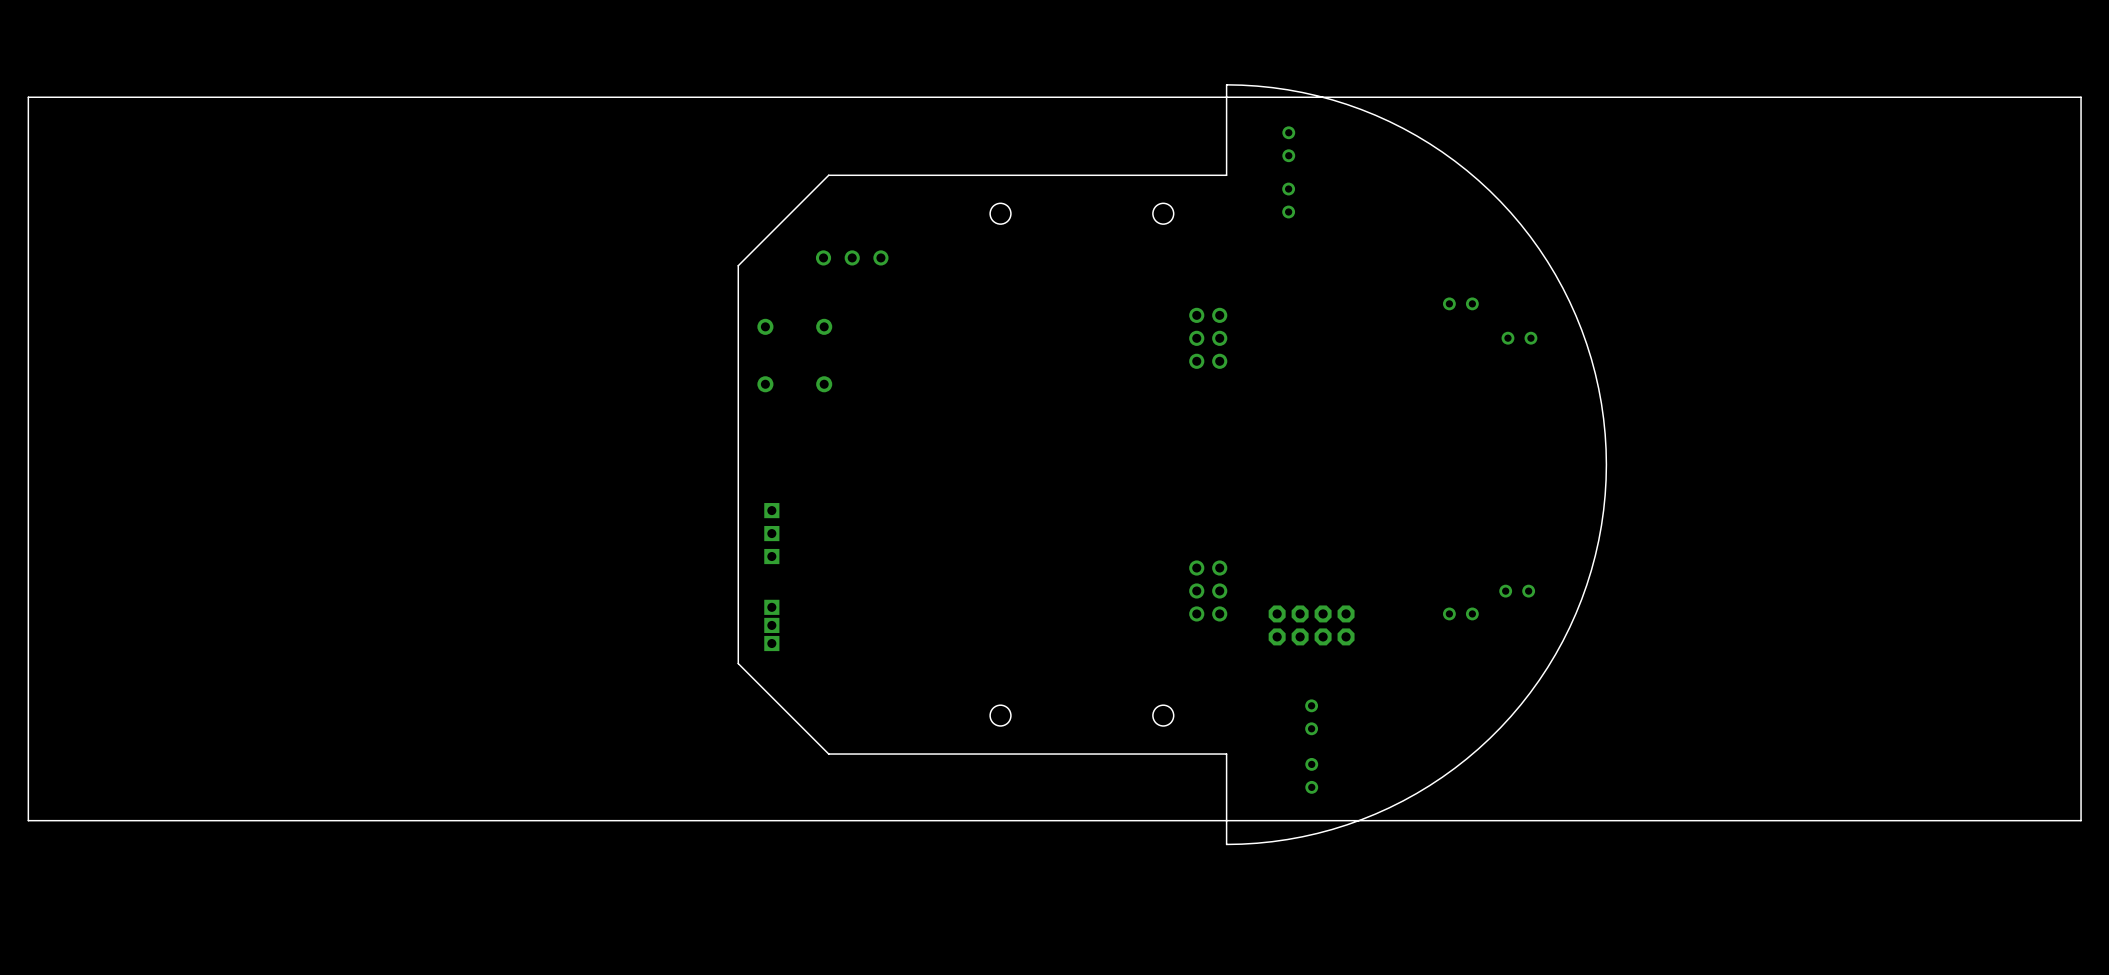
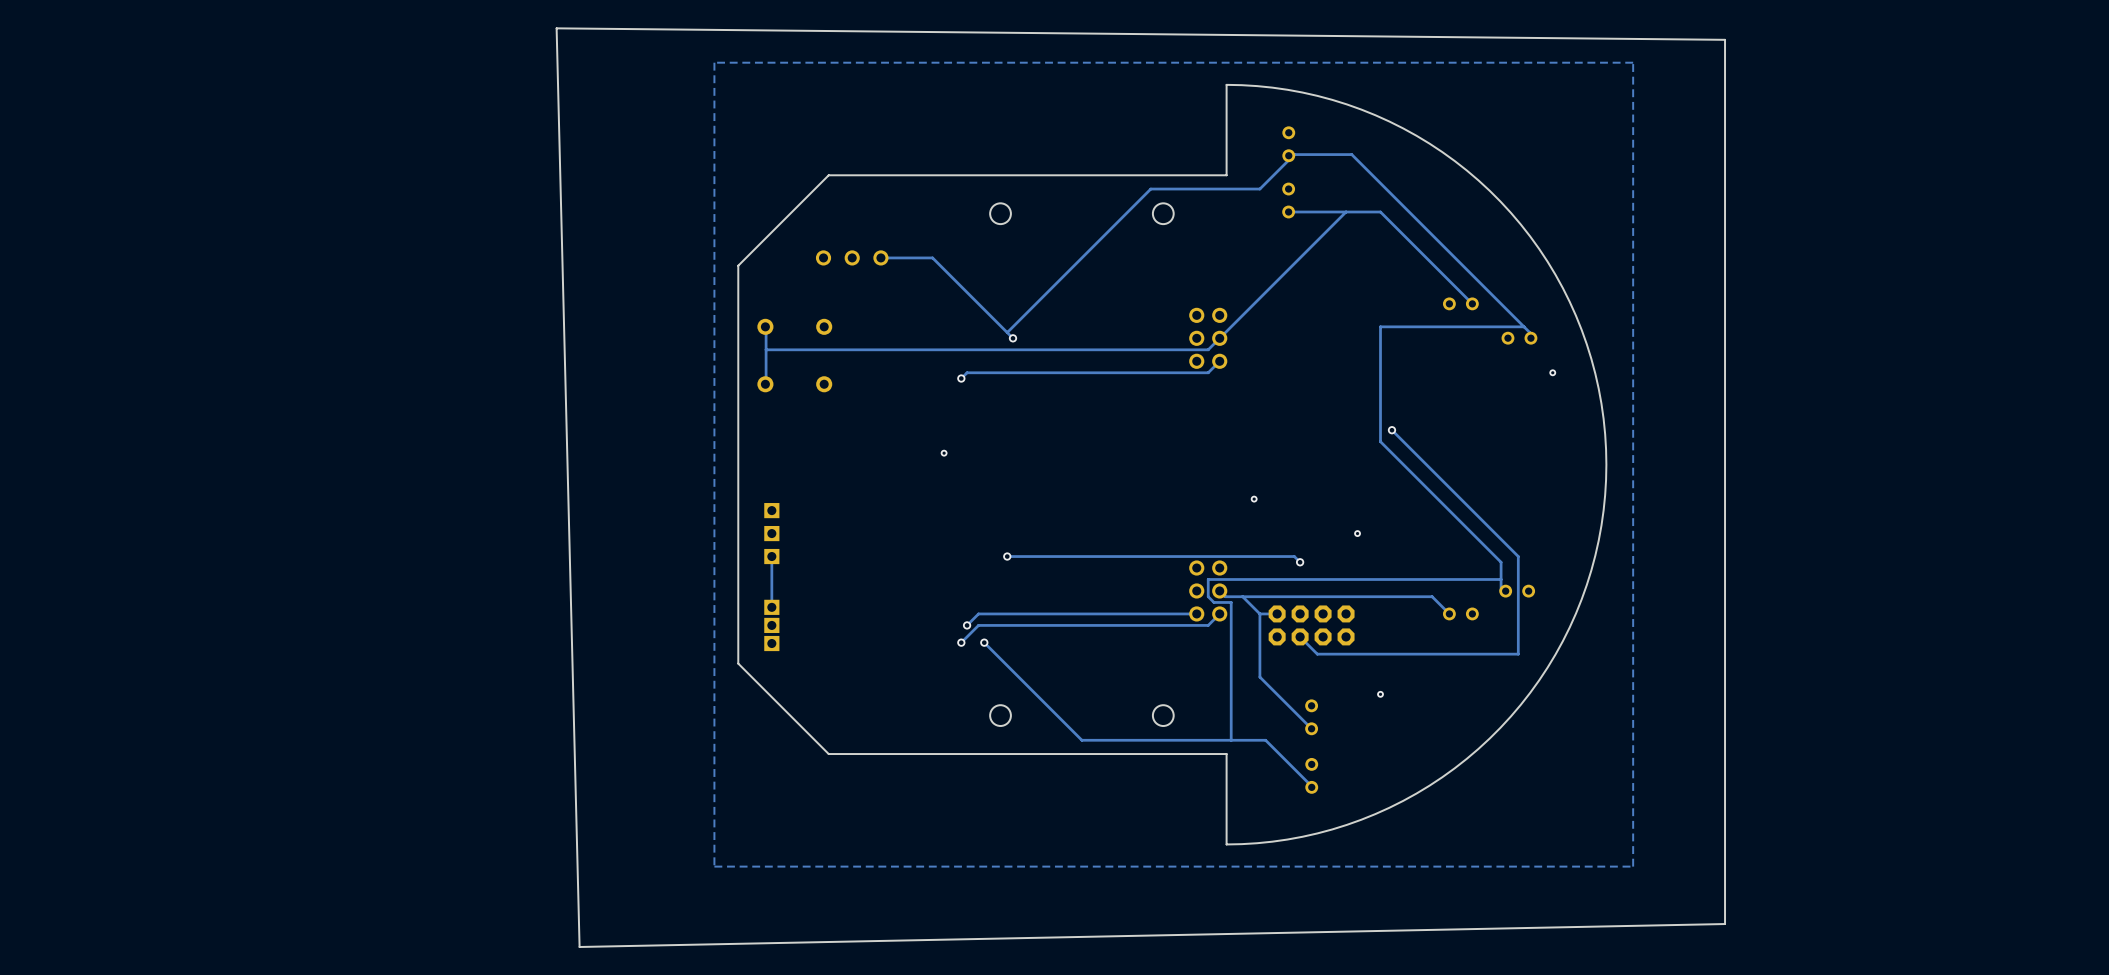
board edge: none -> (556, 28) (579, 946) (1725, 924) (1725, 39) (556, 28)
zone outline: none -> (1633, 62) (714, 62) (714, 866) (1633, 866) (1633, 62)
board edge: (2081, 97) (28, 97) (28, 820) (2081, 820) (2081, 97) -> none
track: none -> (1288, 212) (1380, 212) (1472, 303)
track: none -> (1346, 212) (1208, 349) (766, 349)
track: none -> (880, 257) (932, 257) (1013, 338)
track: none -> (765, 326) (765, 384)
track: none -> (1524, 326) (1380, 326) (1380, 441) (1501, 562) (1501, 590) (1505, 591)
track: none -> (1007, 332) (1150, 189) (1259, 189) (1288, 160) (1288, 155) (1351, 154) (1529, 332) (1530, 338)
via: none -> (1013, 338)
track: none -> (1219, 361) (1208, 372) (967, 372) (961, 378)
via: none -> (1552, 372)
via: none -> (961, 378)
track: none -> (1391, 430) (1518, 556) (1518, 654) (1317, 654) (1300, 636)
via: none -> (1391, 430)
via: none -> (944, 453)
via: none -> (1254, 499)
via: none -> (1357, 533)
track: none -> (771, 556) (771, 607)
track: none -> (1007, 556) (1294, 556) (1300, 562)
via: none -> (1007, 556)
via: none -> (1300, 562)
track: none -> (1501, 579) (1208, 579) (1208, 596) (1213, 602) (1231, 602) (1231, 740)
track: none -> (1219, 590) (1225, 596) (1432, 596) (1449, 613)
track: none -> (1242, 596) (1259, 613)
track: none -> (1196, 613) (978, 613) (967, 625)
track: none -> (1219, 613) (1208, 625) (978, 625) (961, 642)
track: none -> (1259, 613) (1259, 677) (1311, 728)
track: none -> (1277, 613) (1259, 613)
via: none -> (967, 625)
via: none -> (961, 642)
track: none -> (984, 642) (1081, 740) (1265, 740) (1311, 787)
via: none -> (984, 642)
via: none -> (1380, 694)

